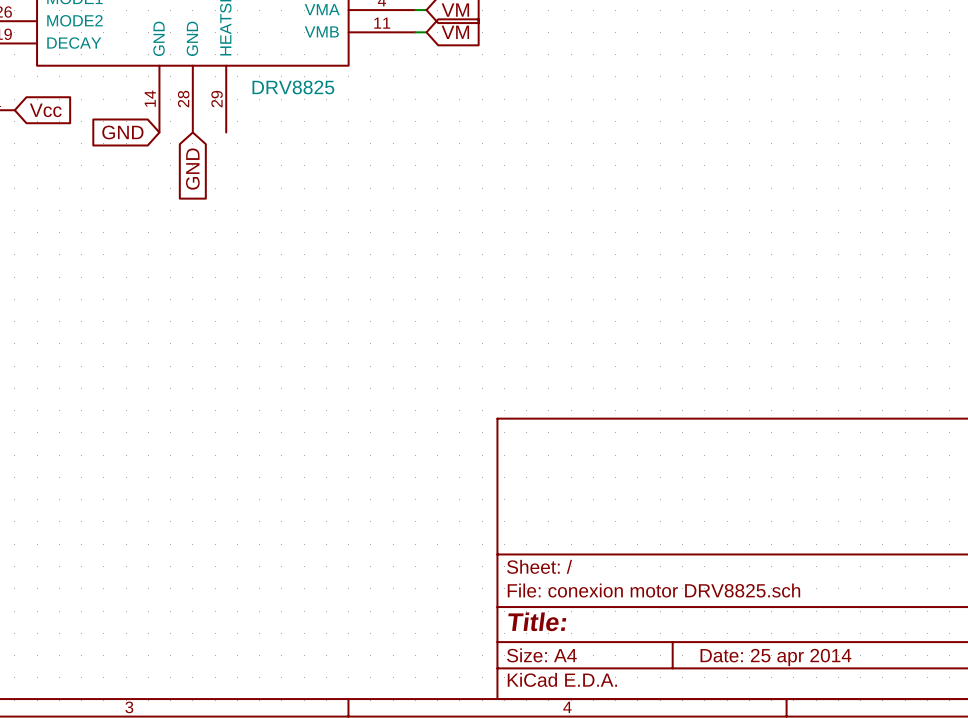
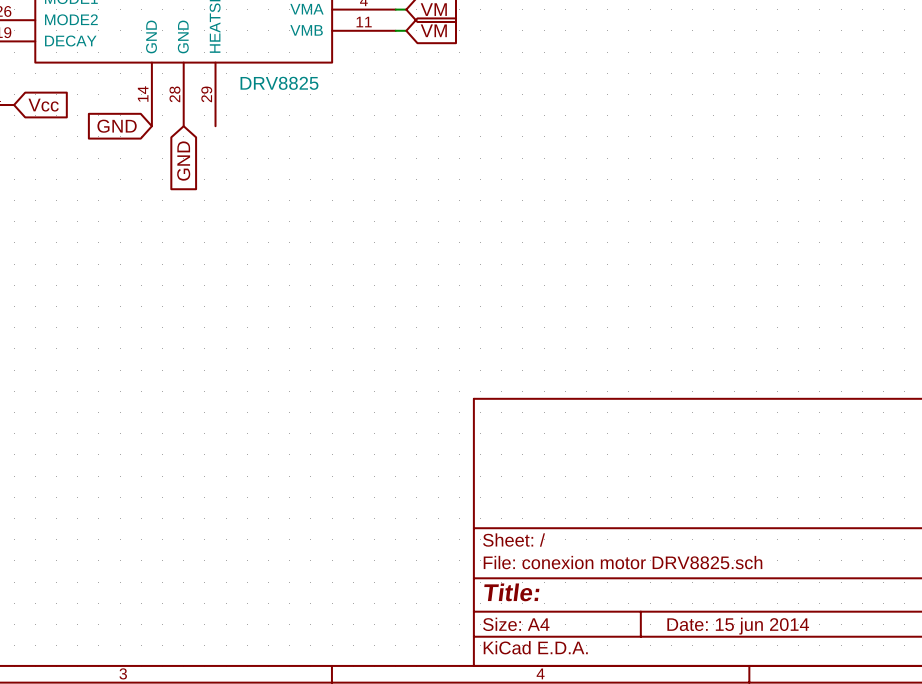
title block: Date: 25 apr 2014 (775, 657) -> Date: 15 jun 2014 (738, 626)

